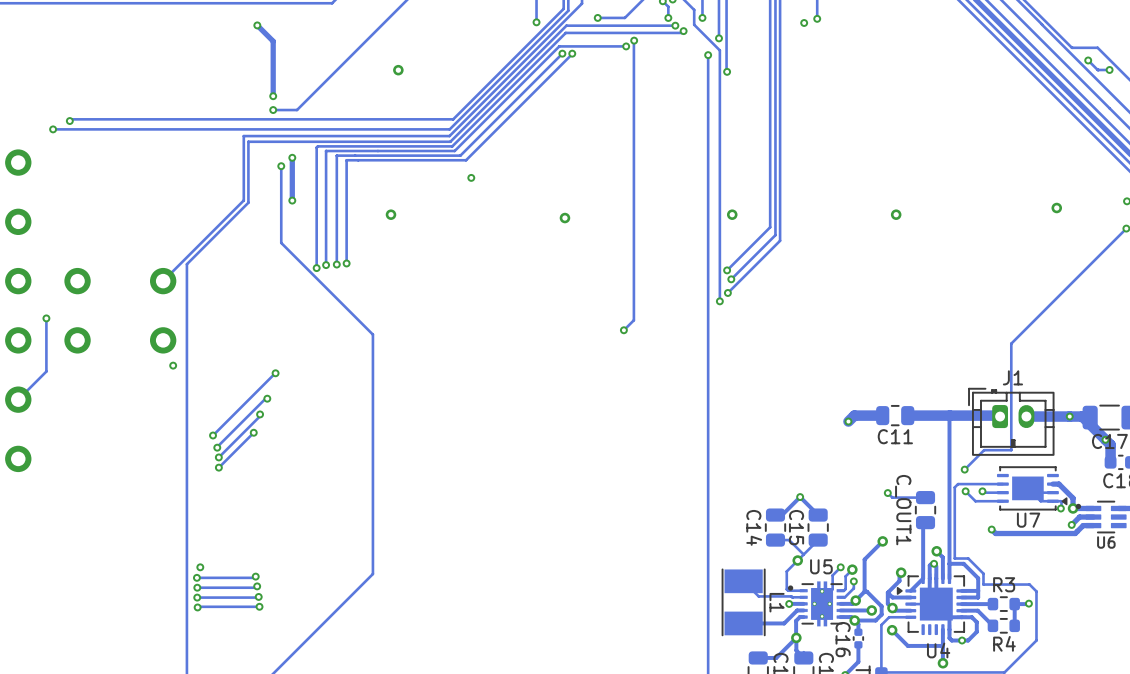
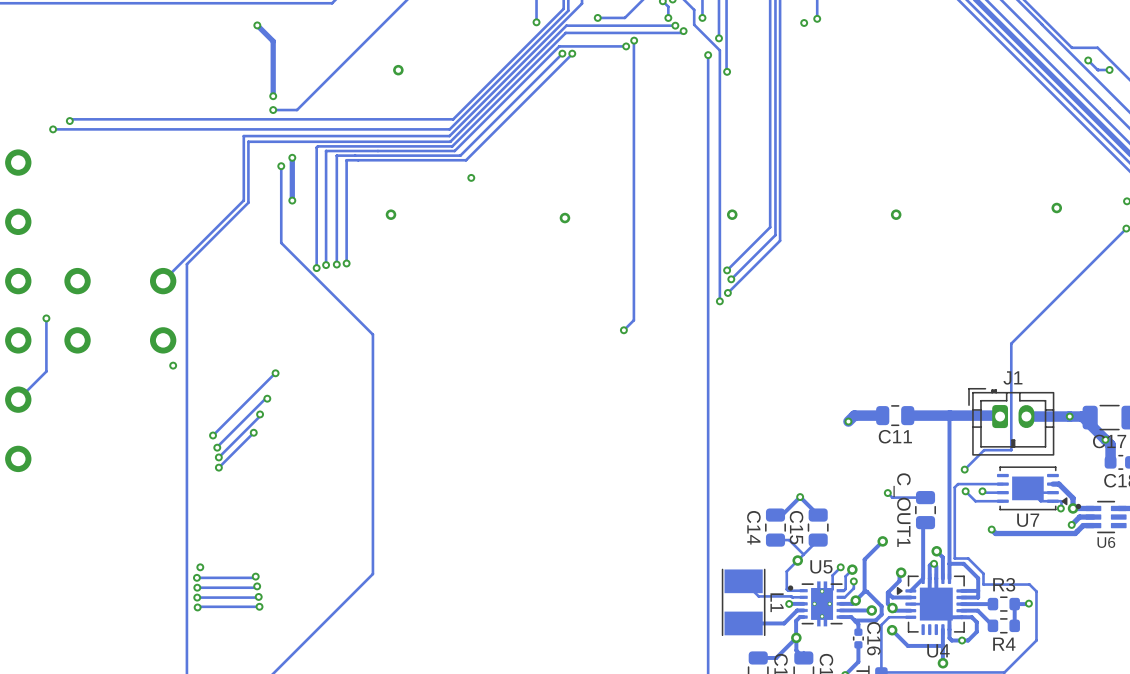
via: (854, 620) -> none
C16 name position: C16 (843, 639) -> C16 (873, 638)

